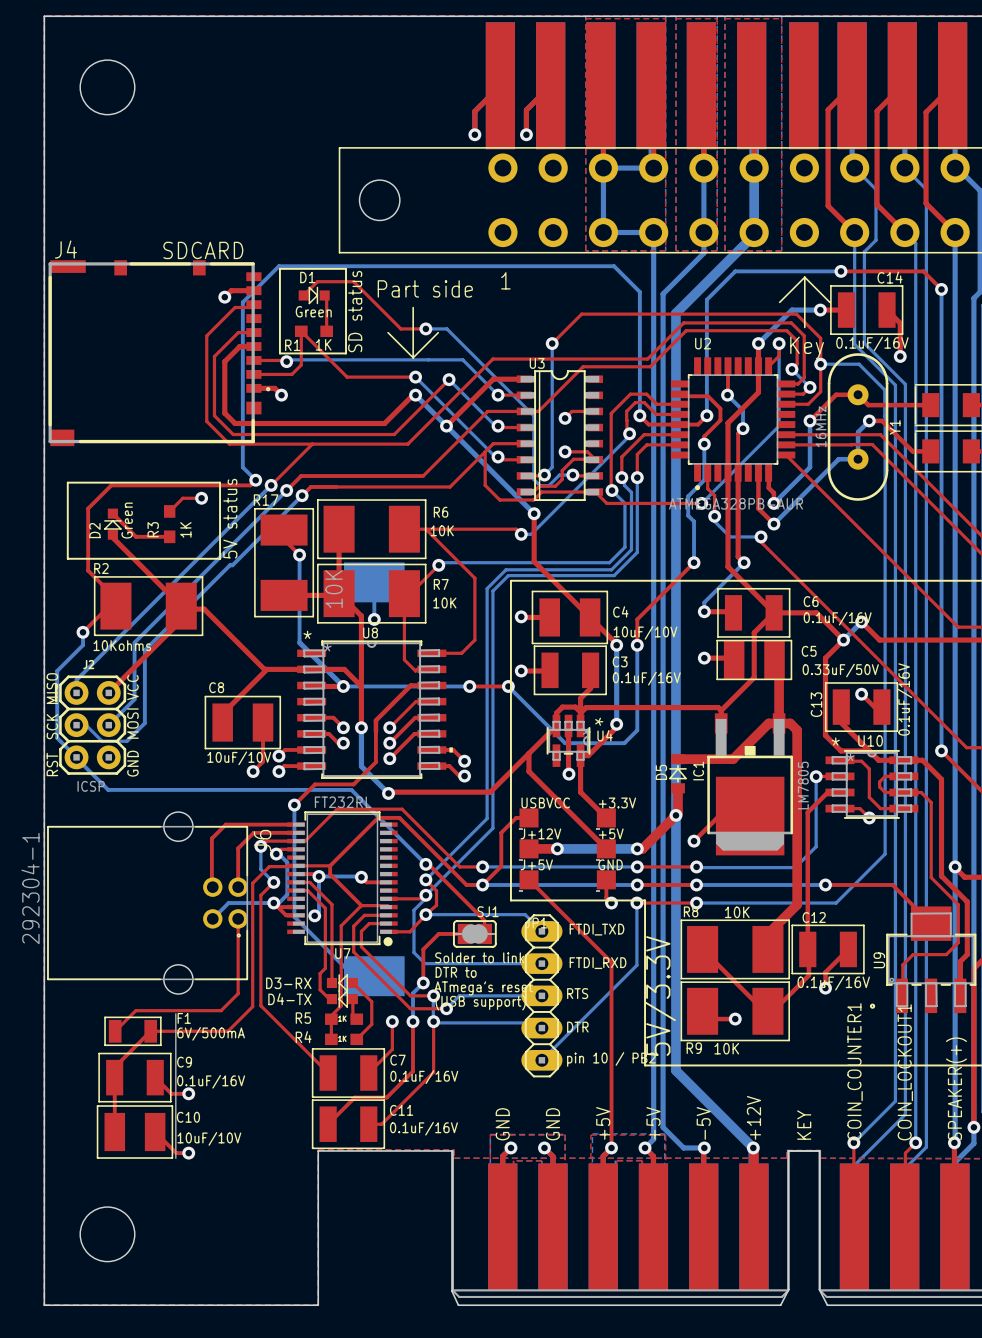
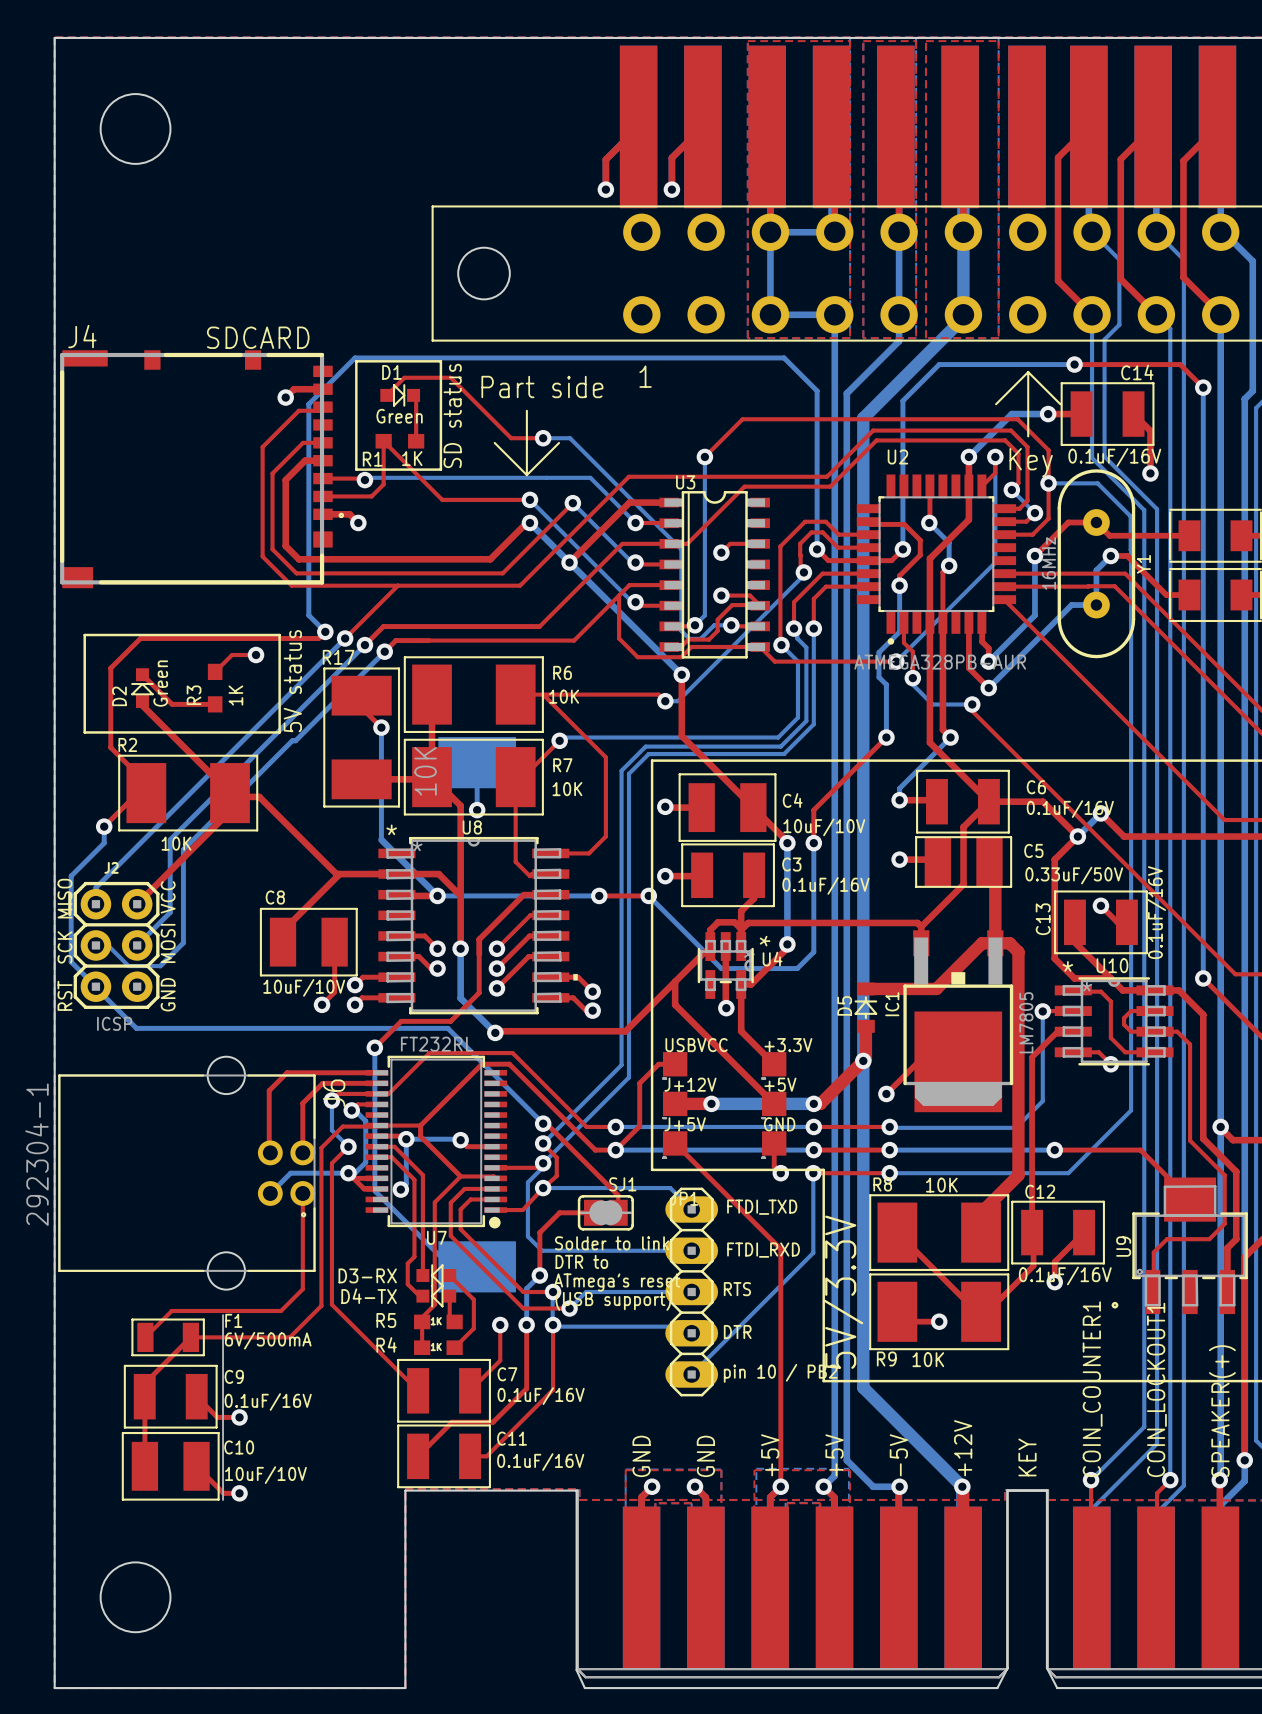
R2 value: 10Kohms (122, 645) -> 10K (176, 843)

